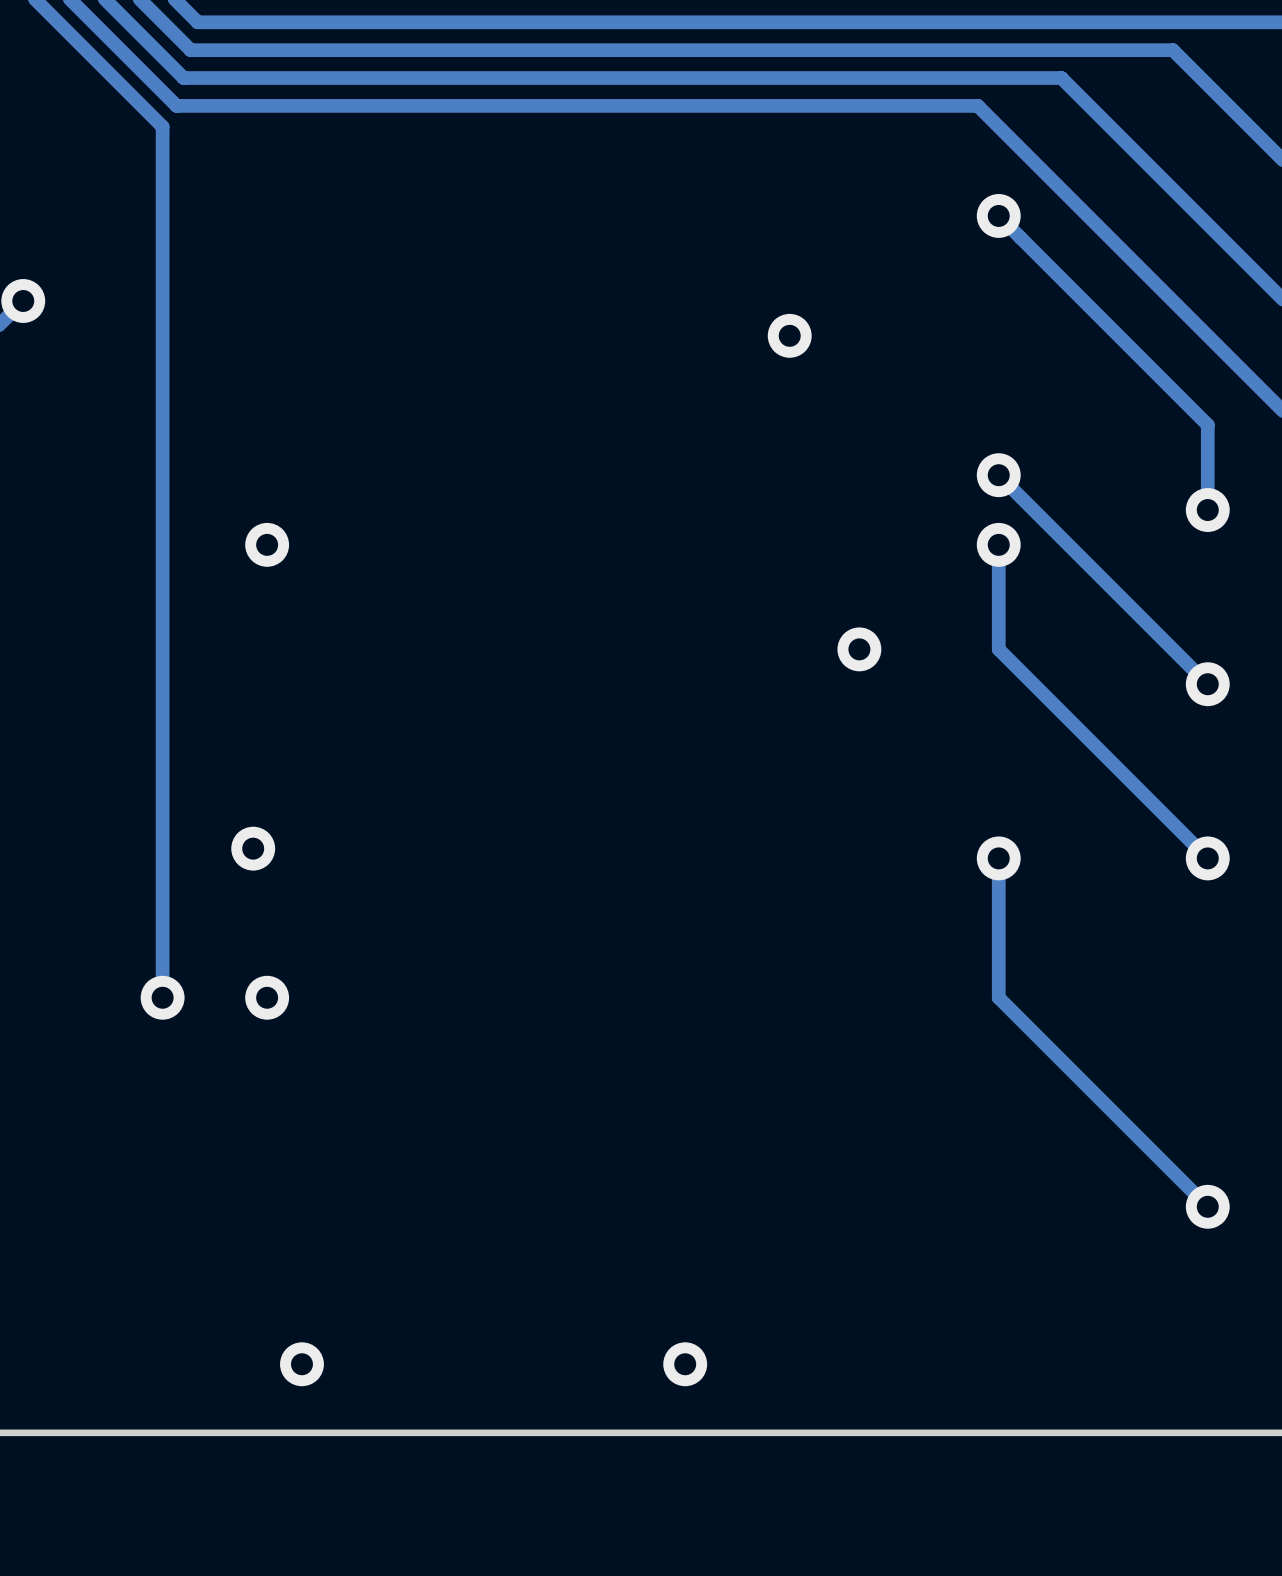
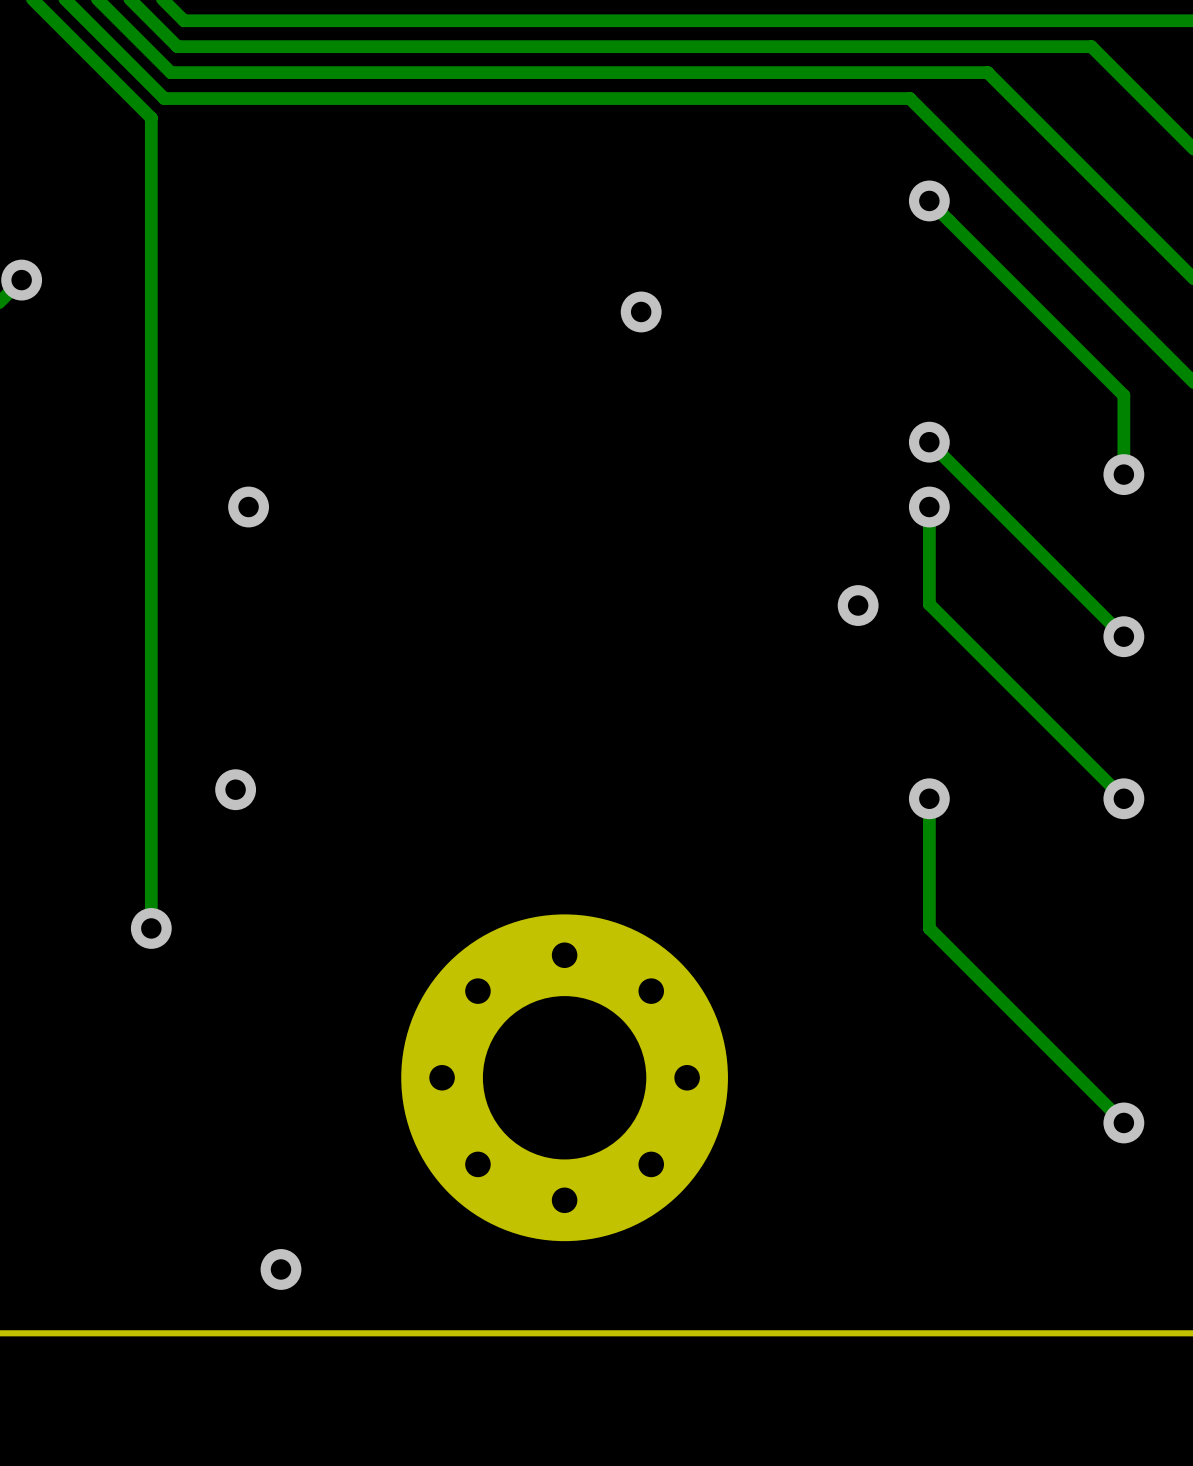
via position: (789, 335) -> (641, 311)
via position: (859, 649) -> (858, 605)
via: (267, 997) -> none
part: none -> (564, 1077)
via: (685, 1364) -> none

